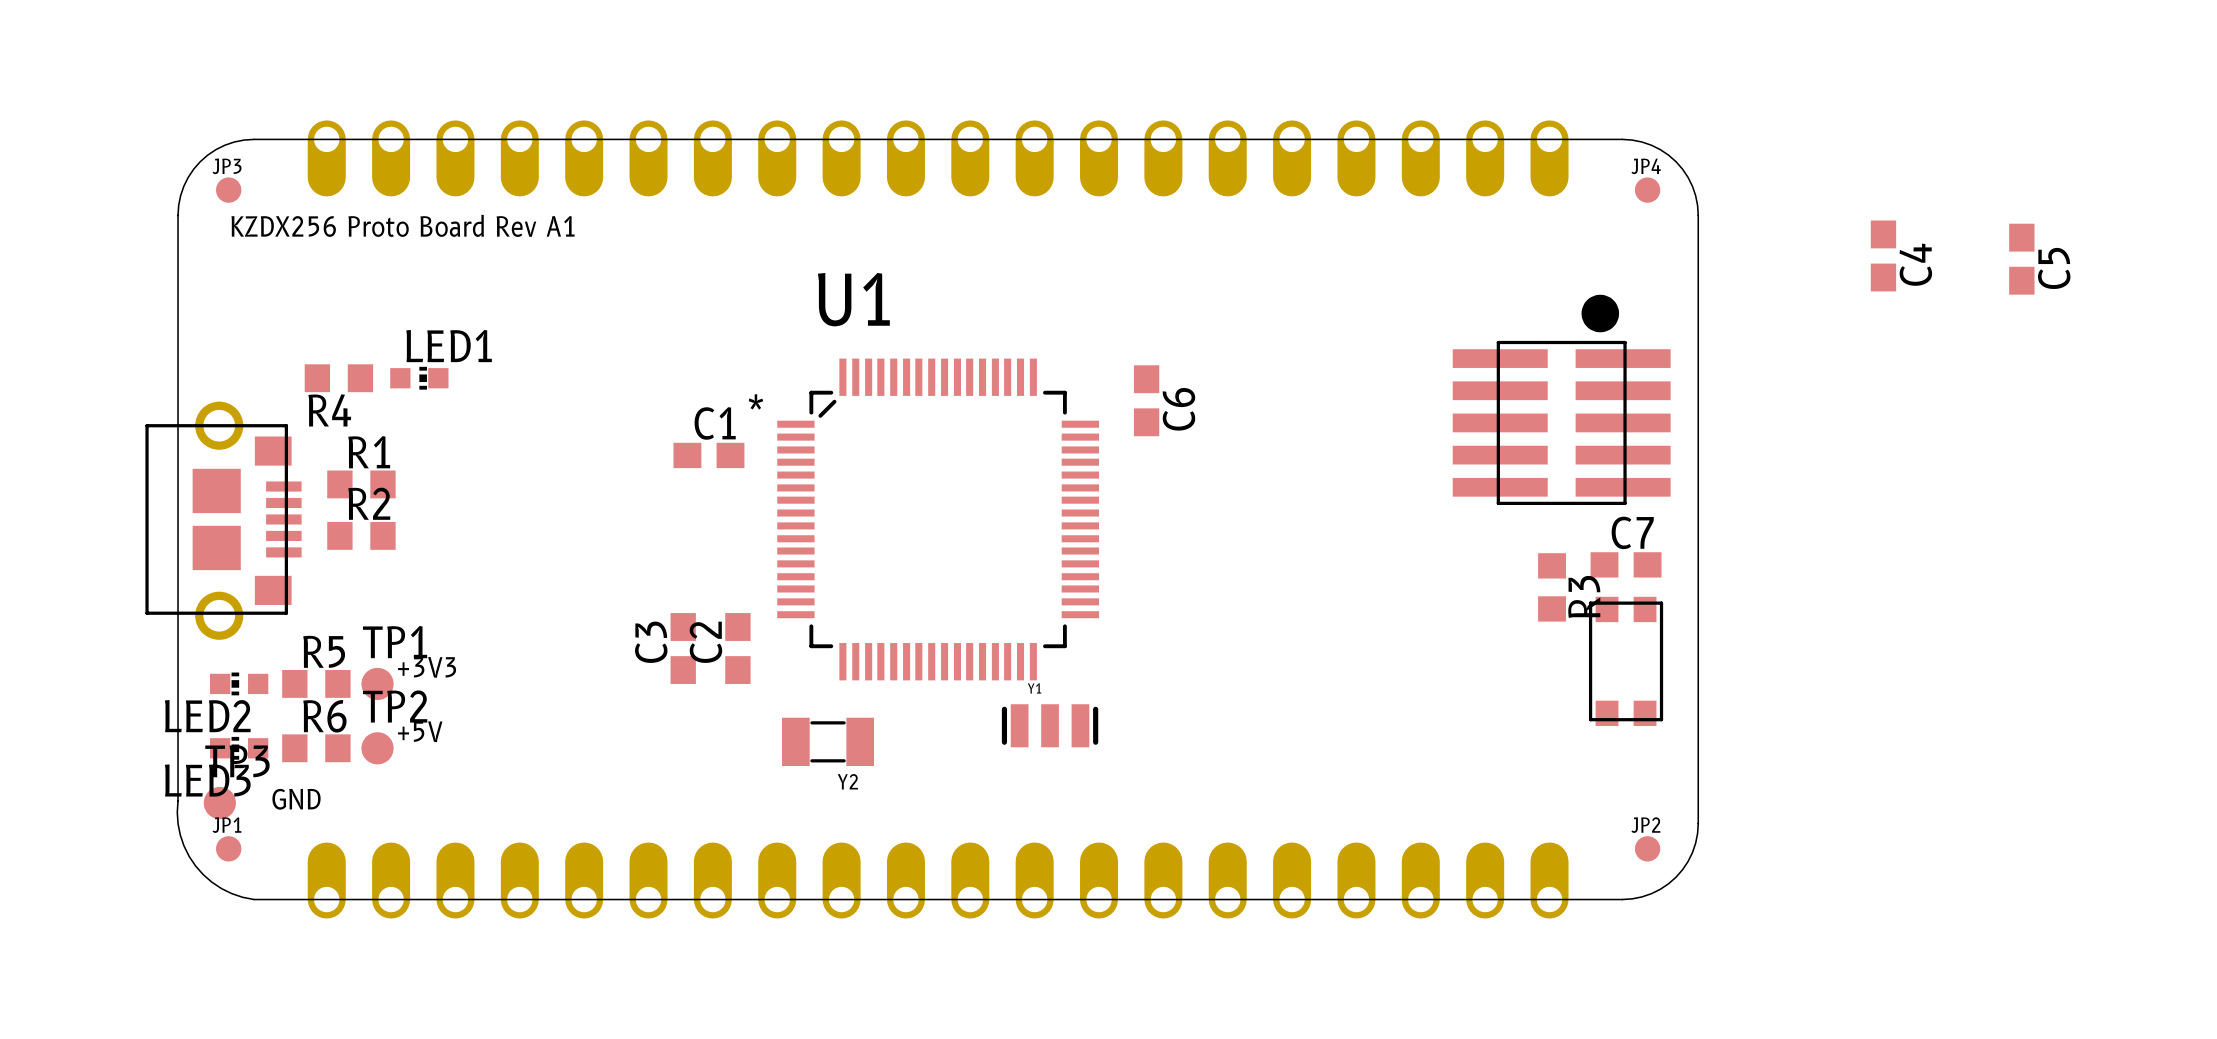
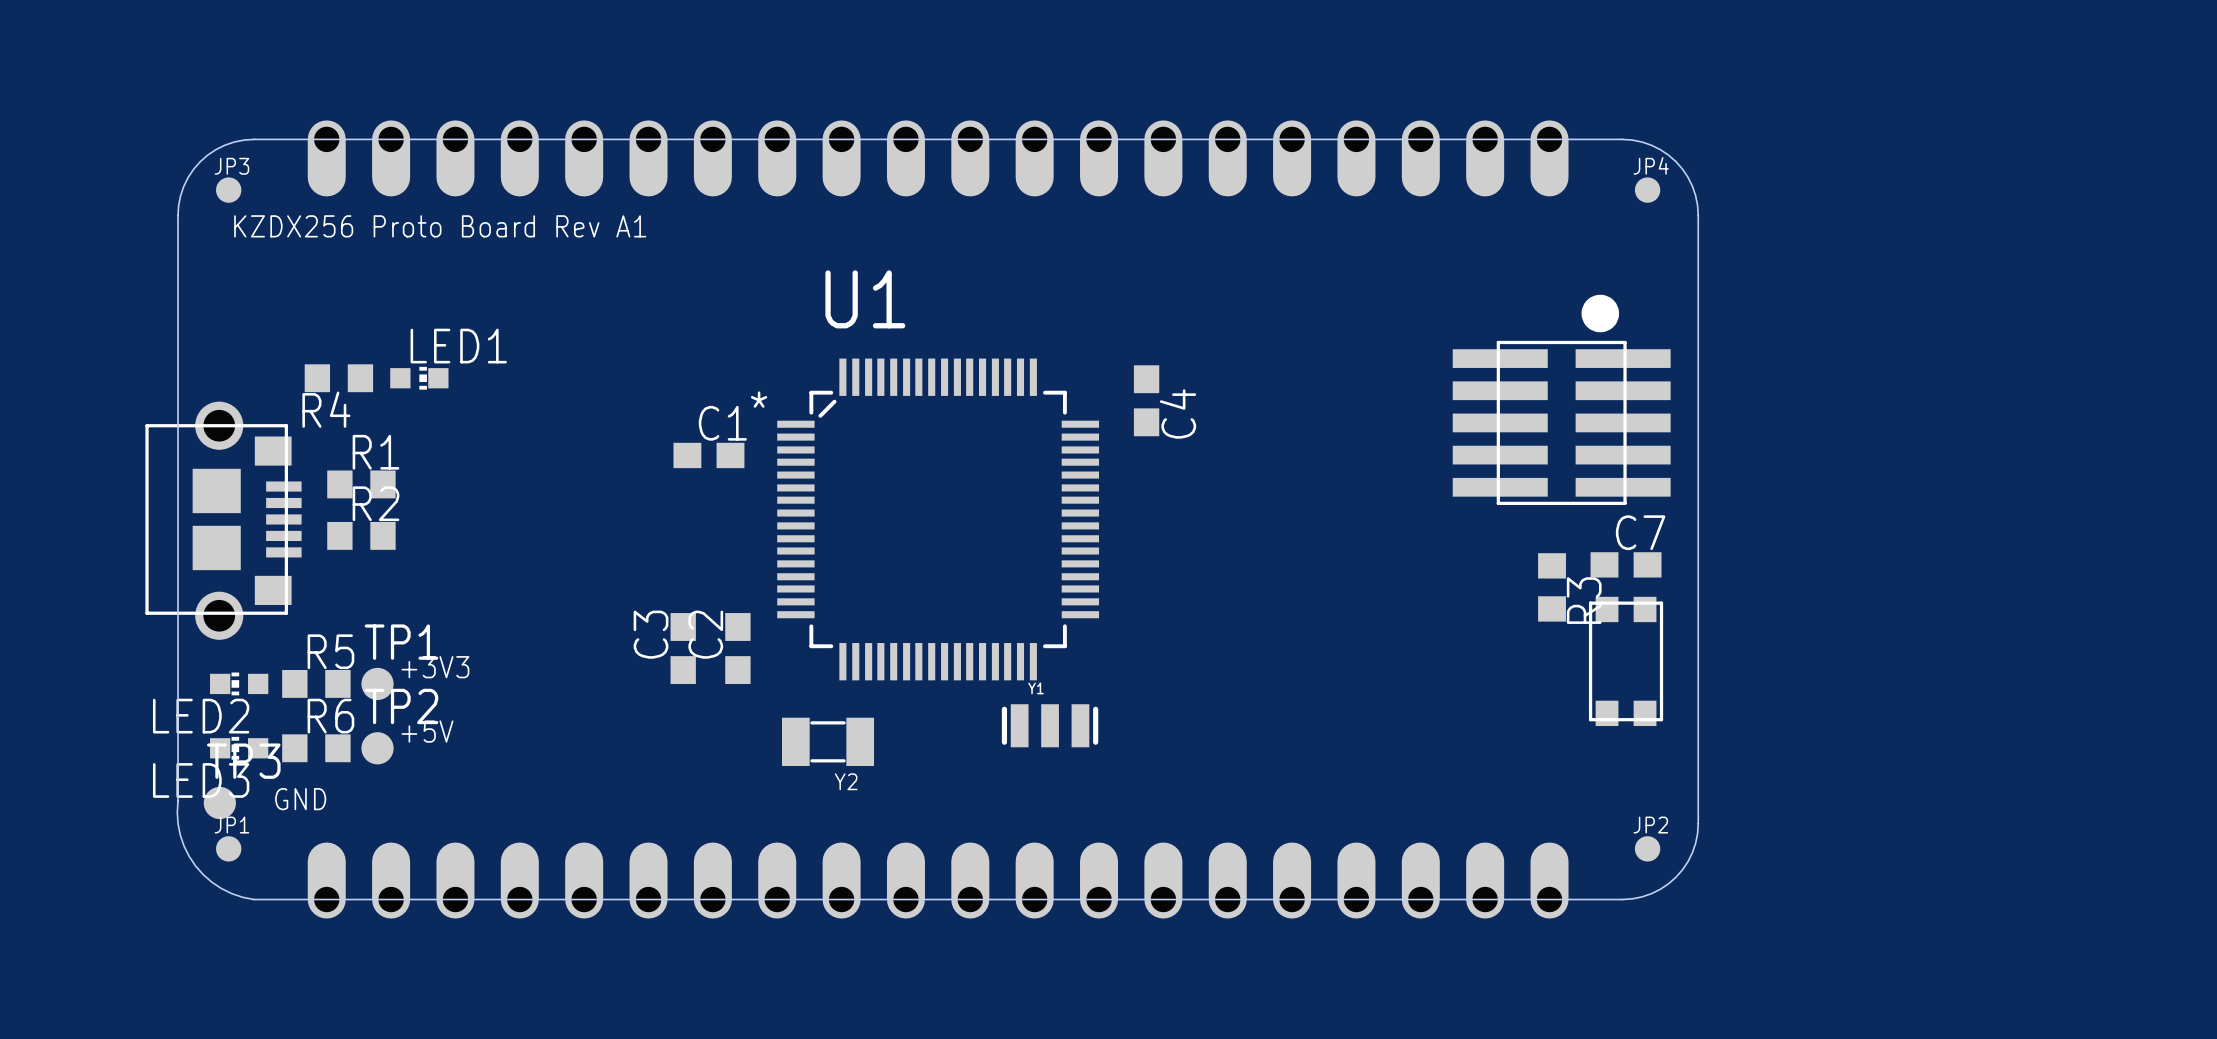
C4: (1883, 255) -> none
C5: (2021, 259) -> none
C6 name: C6 (1178, 409) -> C4 (1177, 413)

